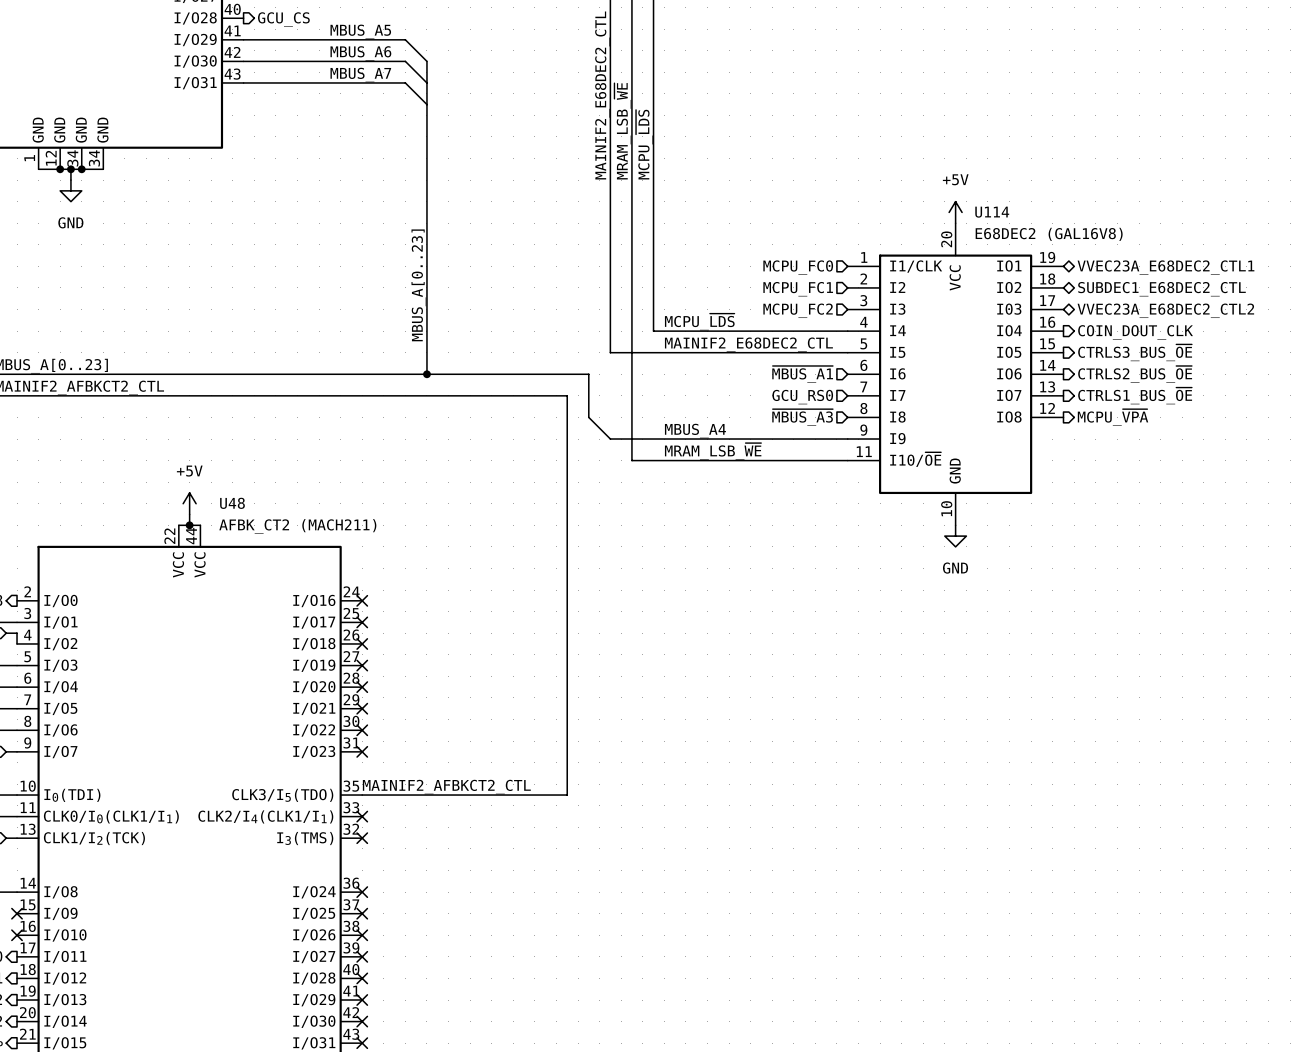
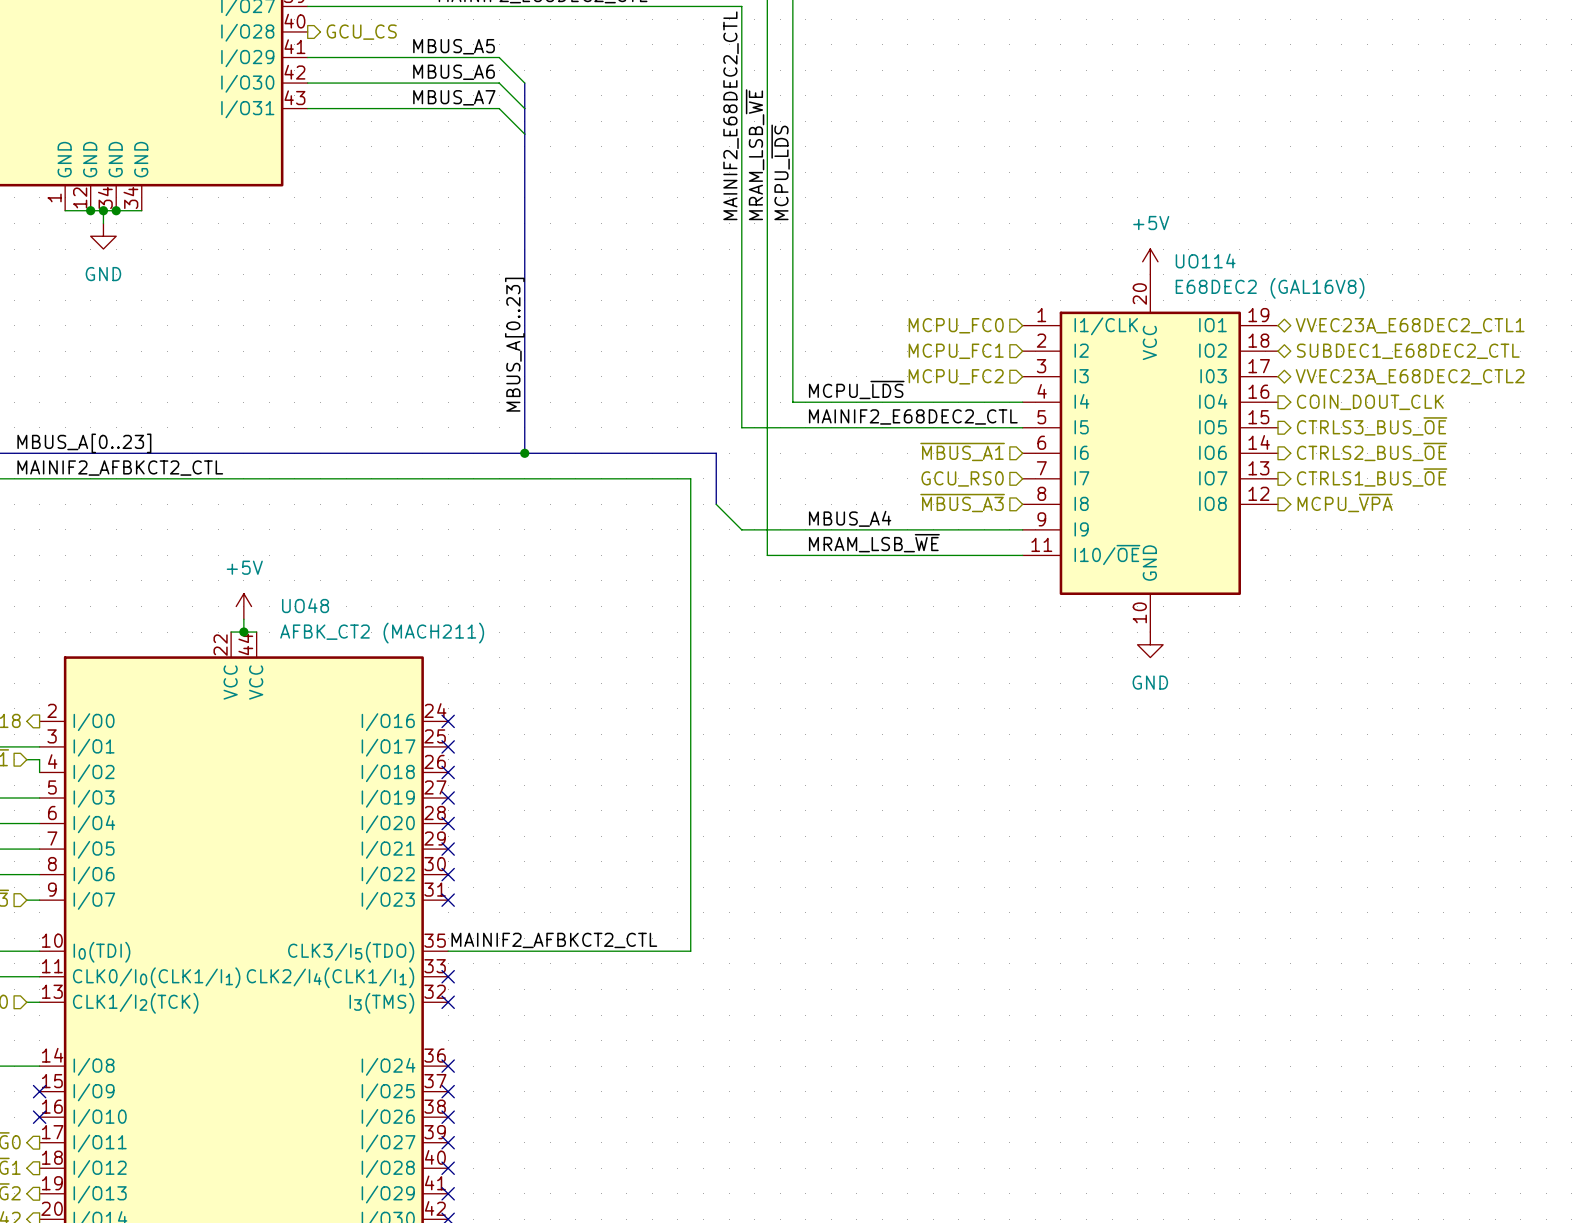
U114 name: U114 (992, 212) -> UO114 (1205, 261)
U48 name: U48 (232, 503) -> UO48 (305, 605)

